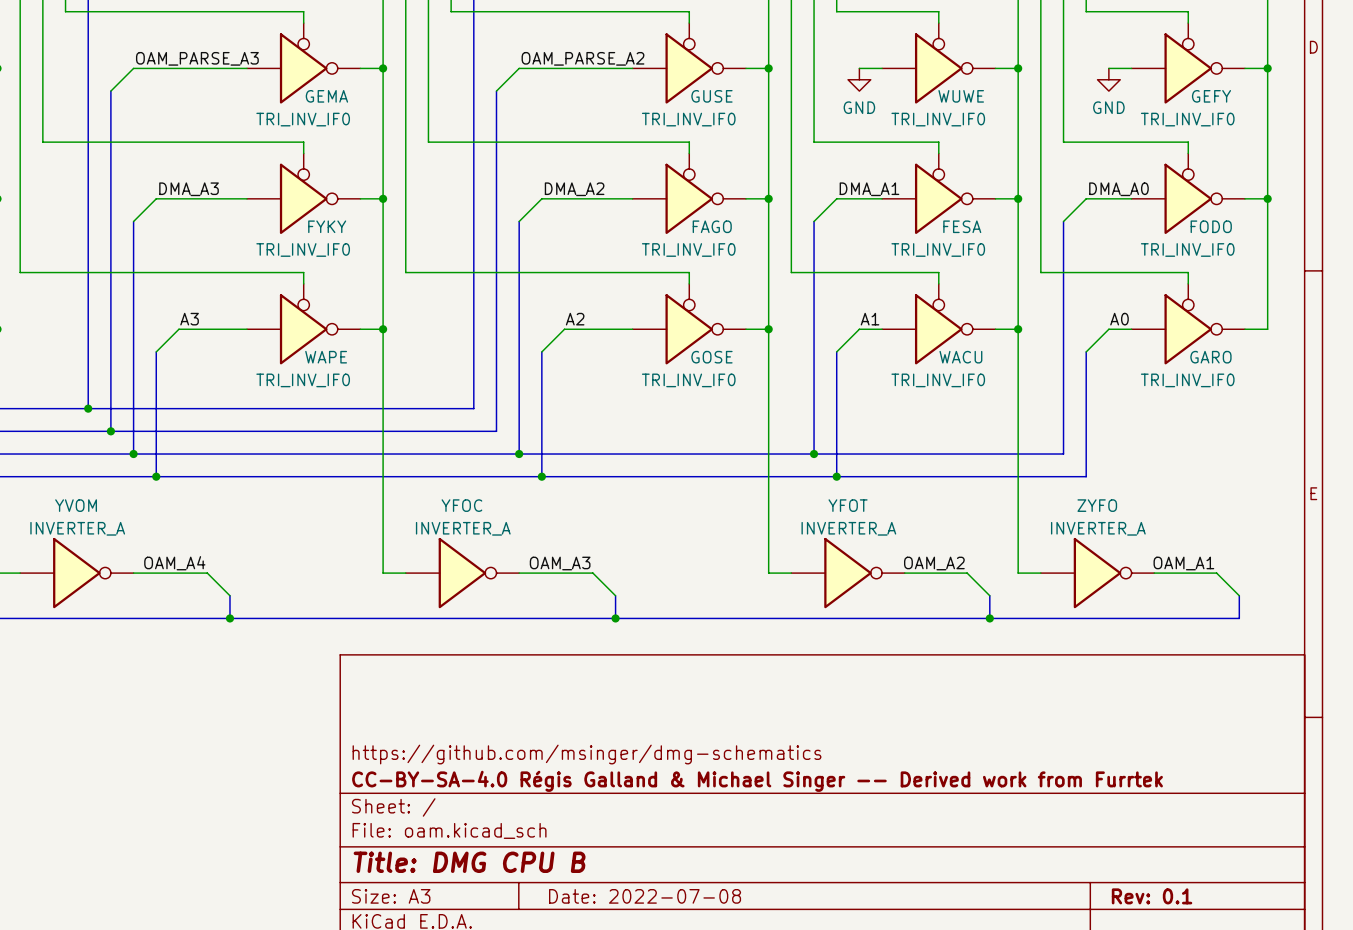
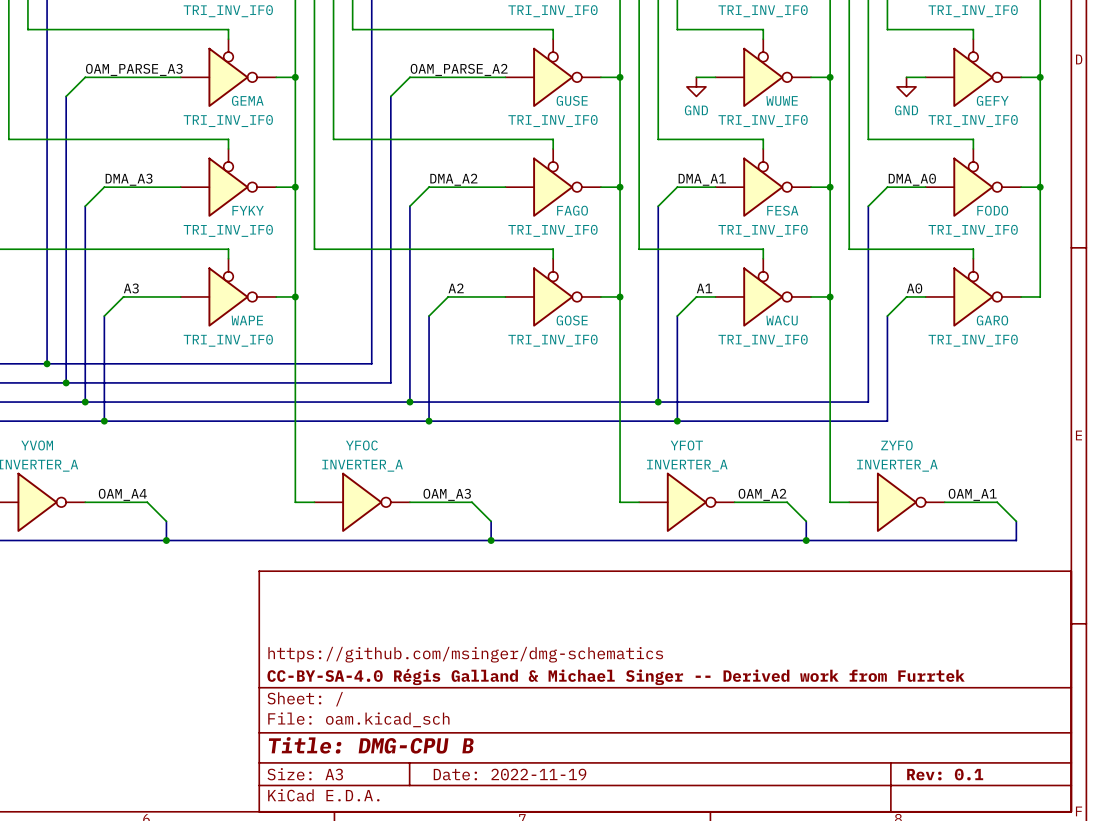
title block: Title: DMG CPU B (469, 862) -> Title: DMG-CPU B (371, 745)
title block: Date: 2022-07-08 (645, 896) -> Date: 2022-11-19 (510, 774)

